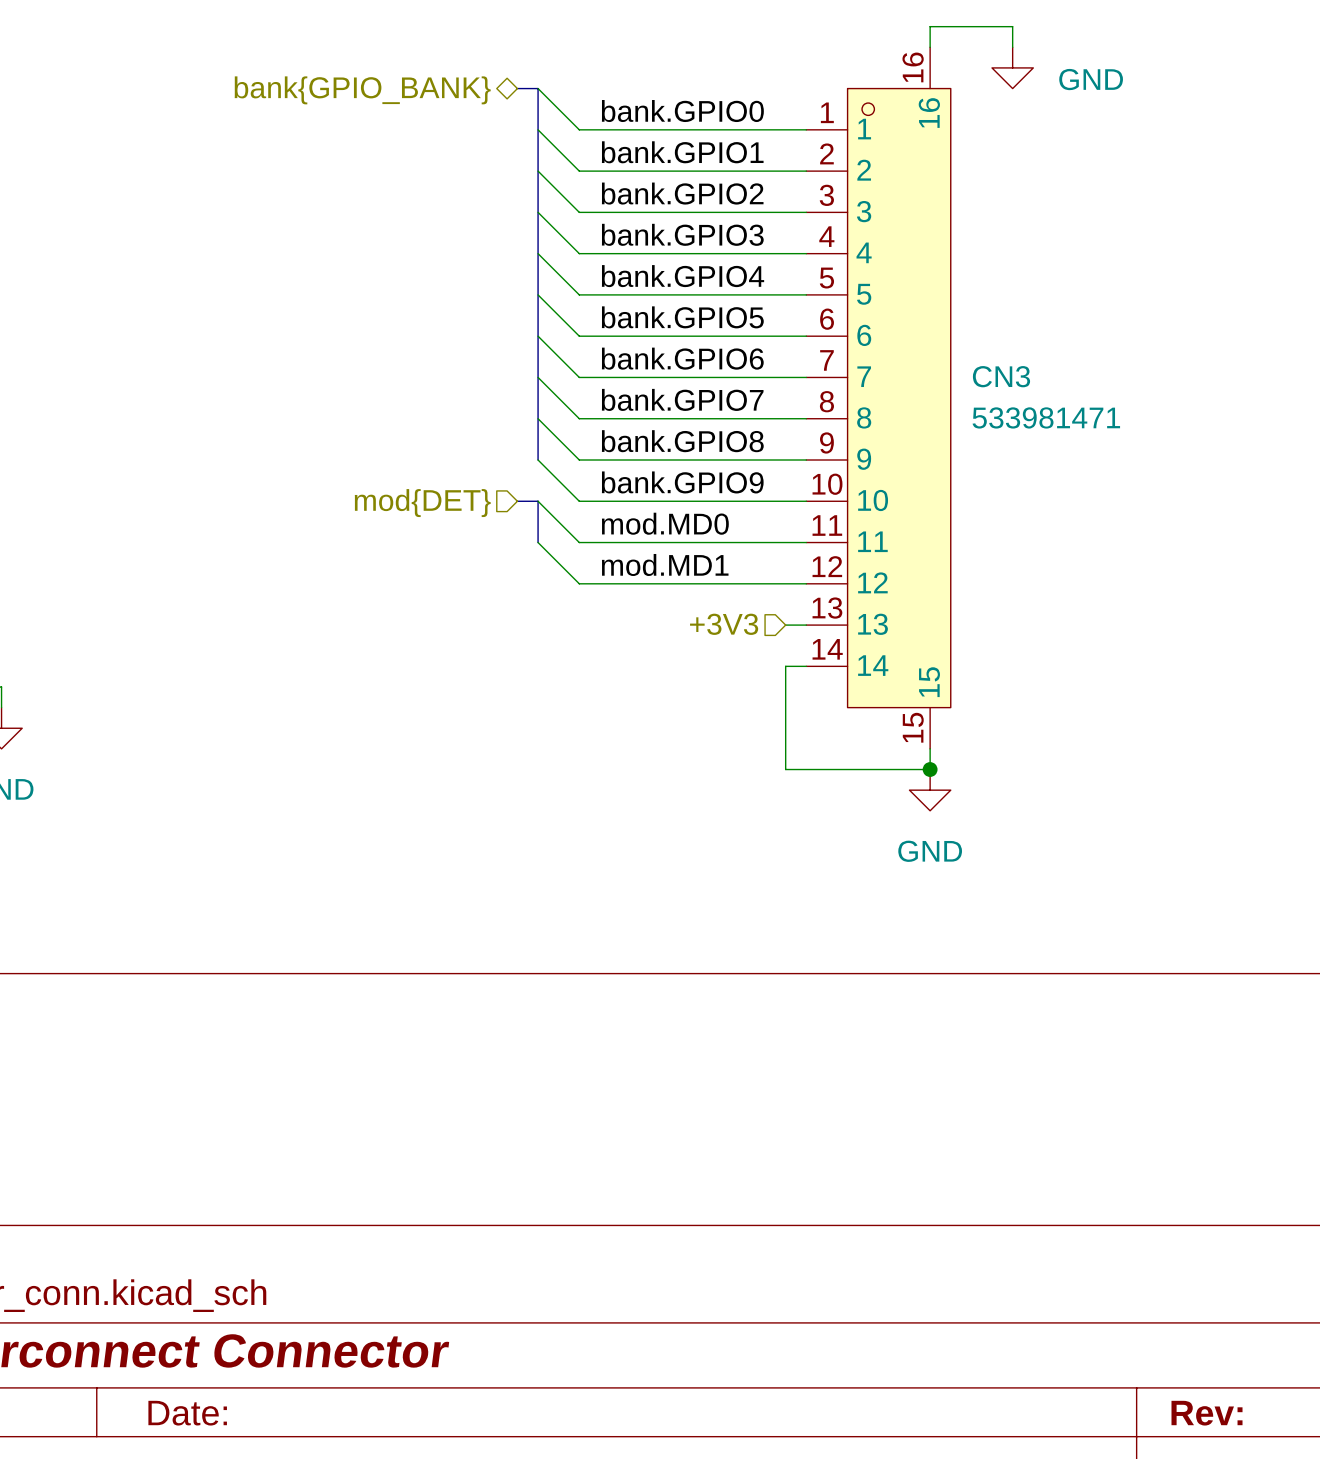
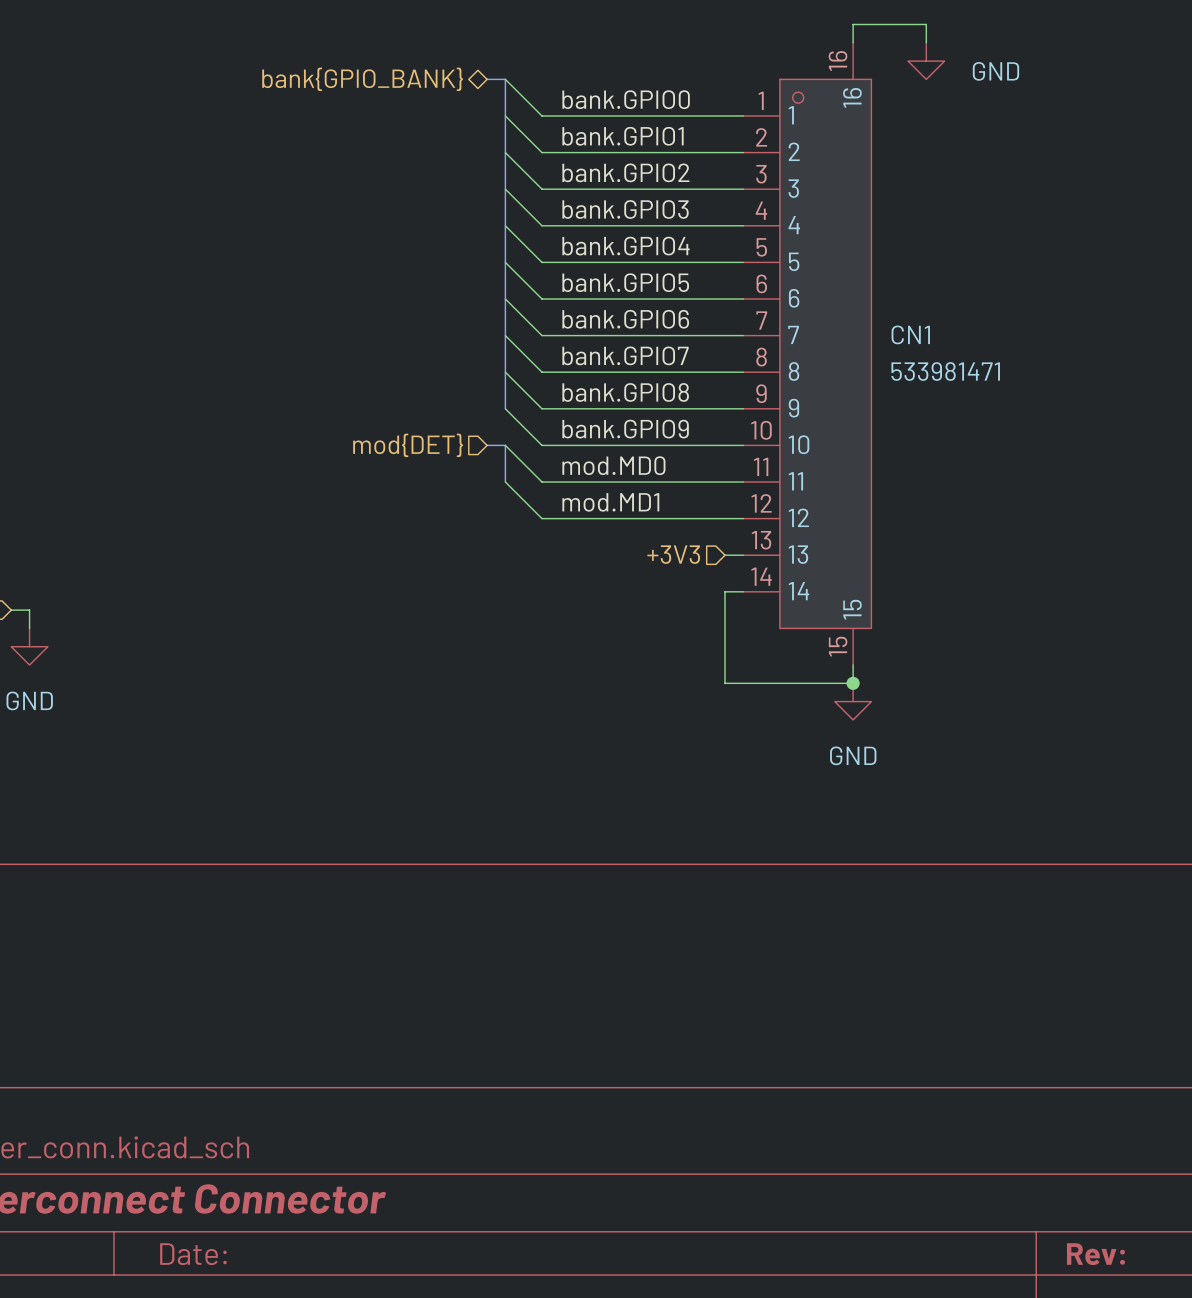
CN3 name: CN3 (1001, 376) -> CN1 (910, 334)

